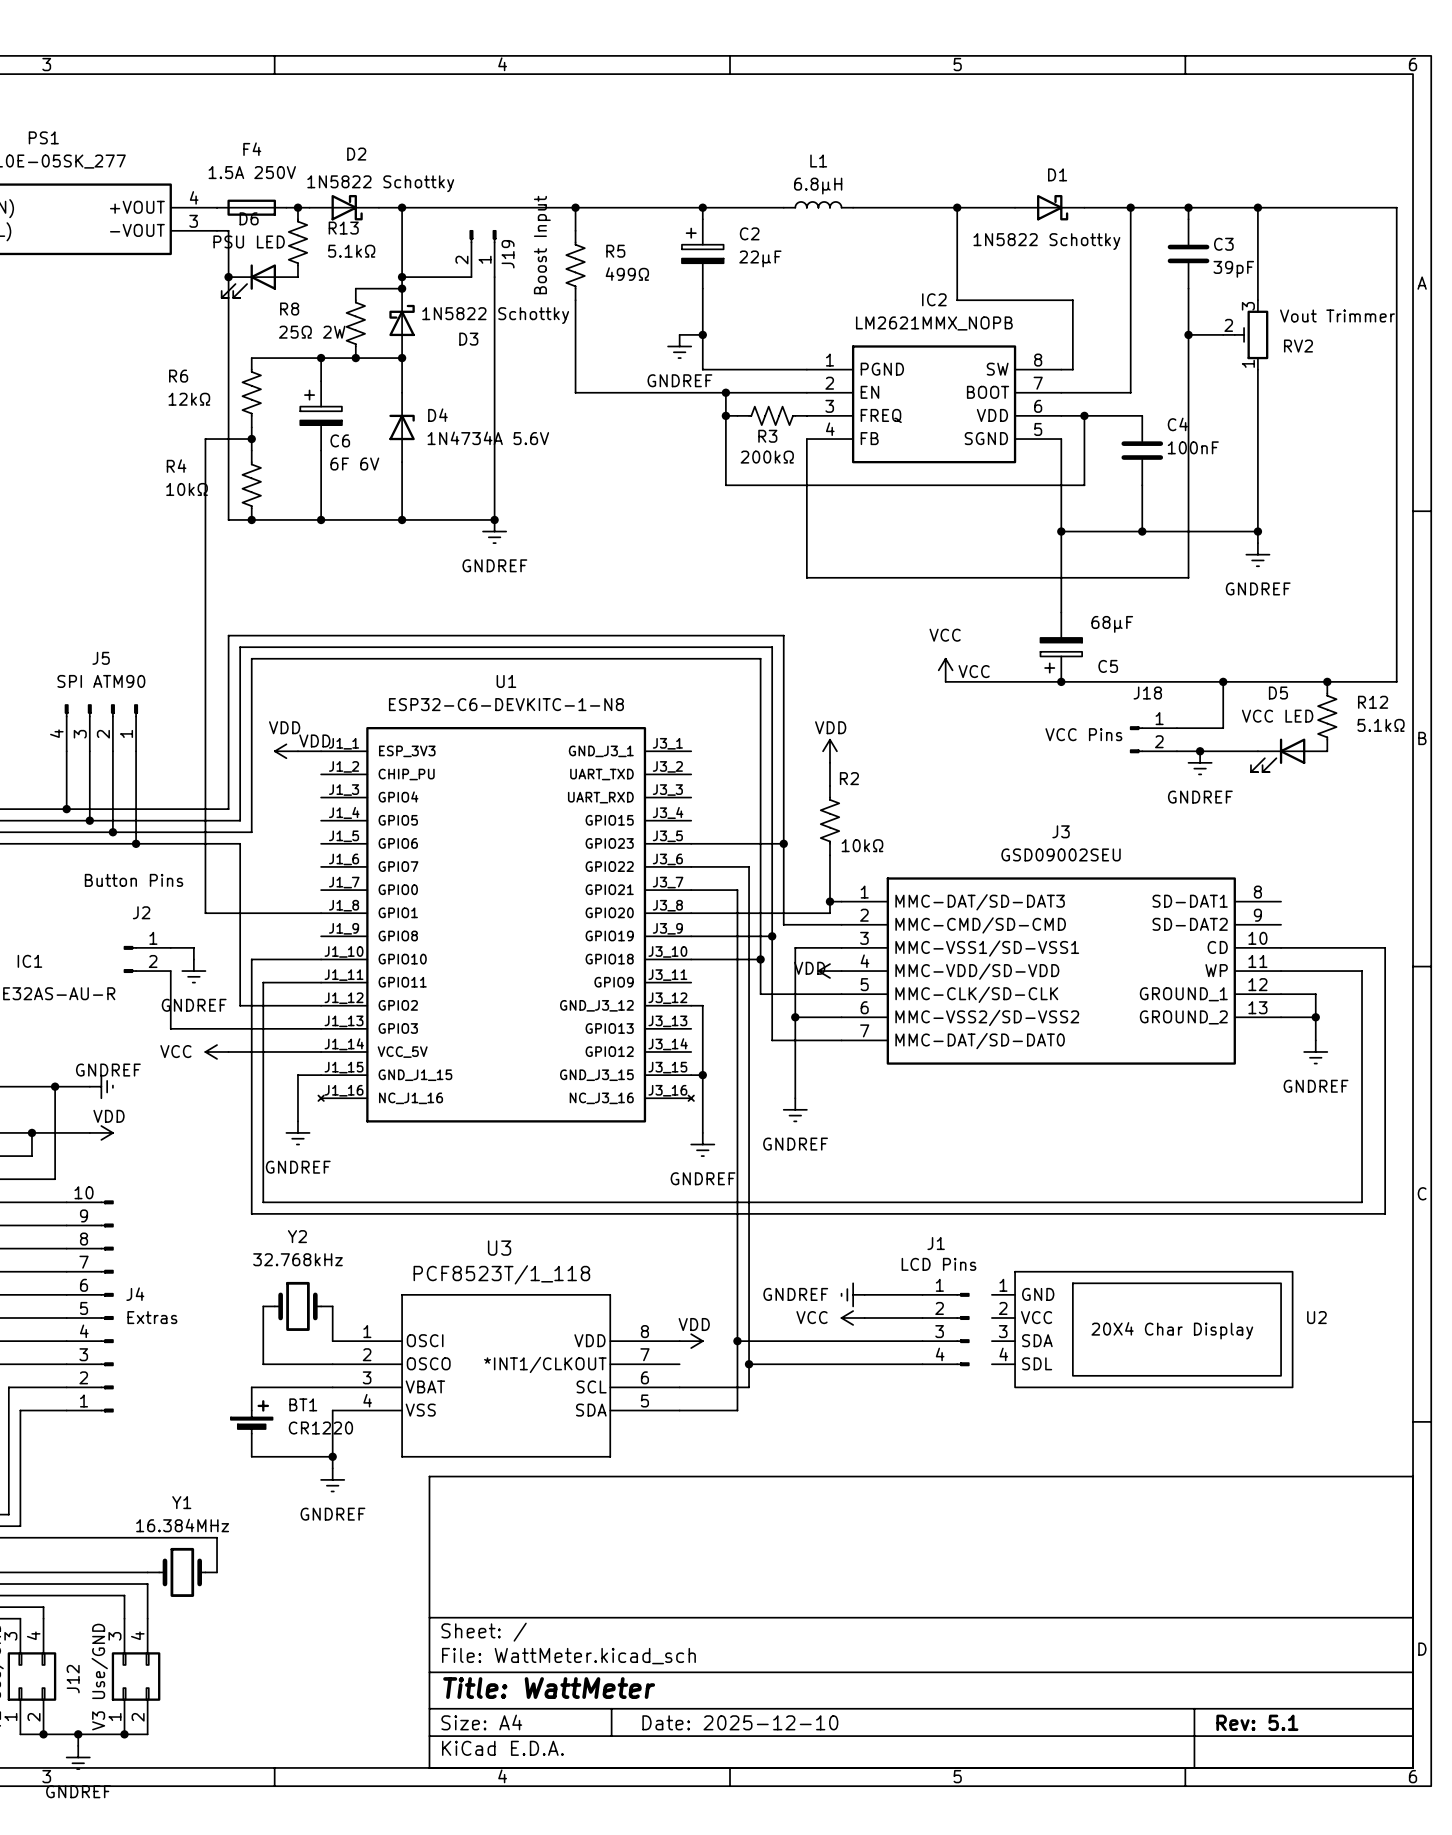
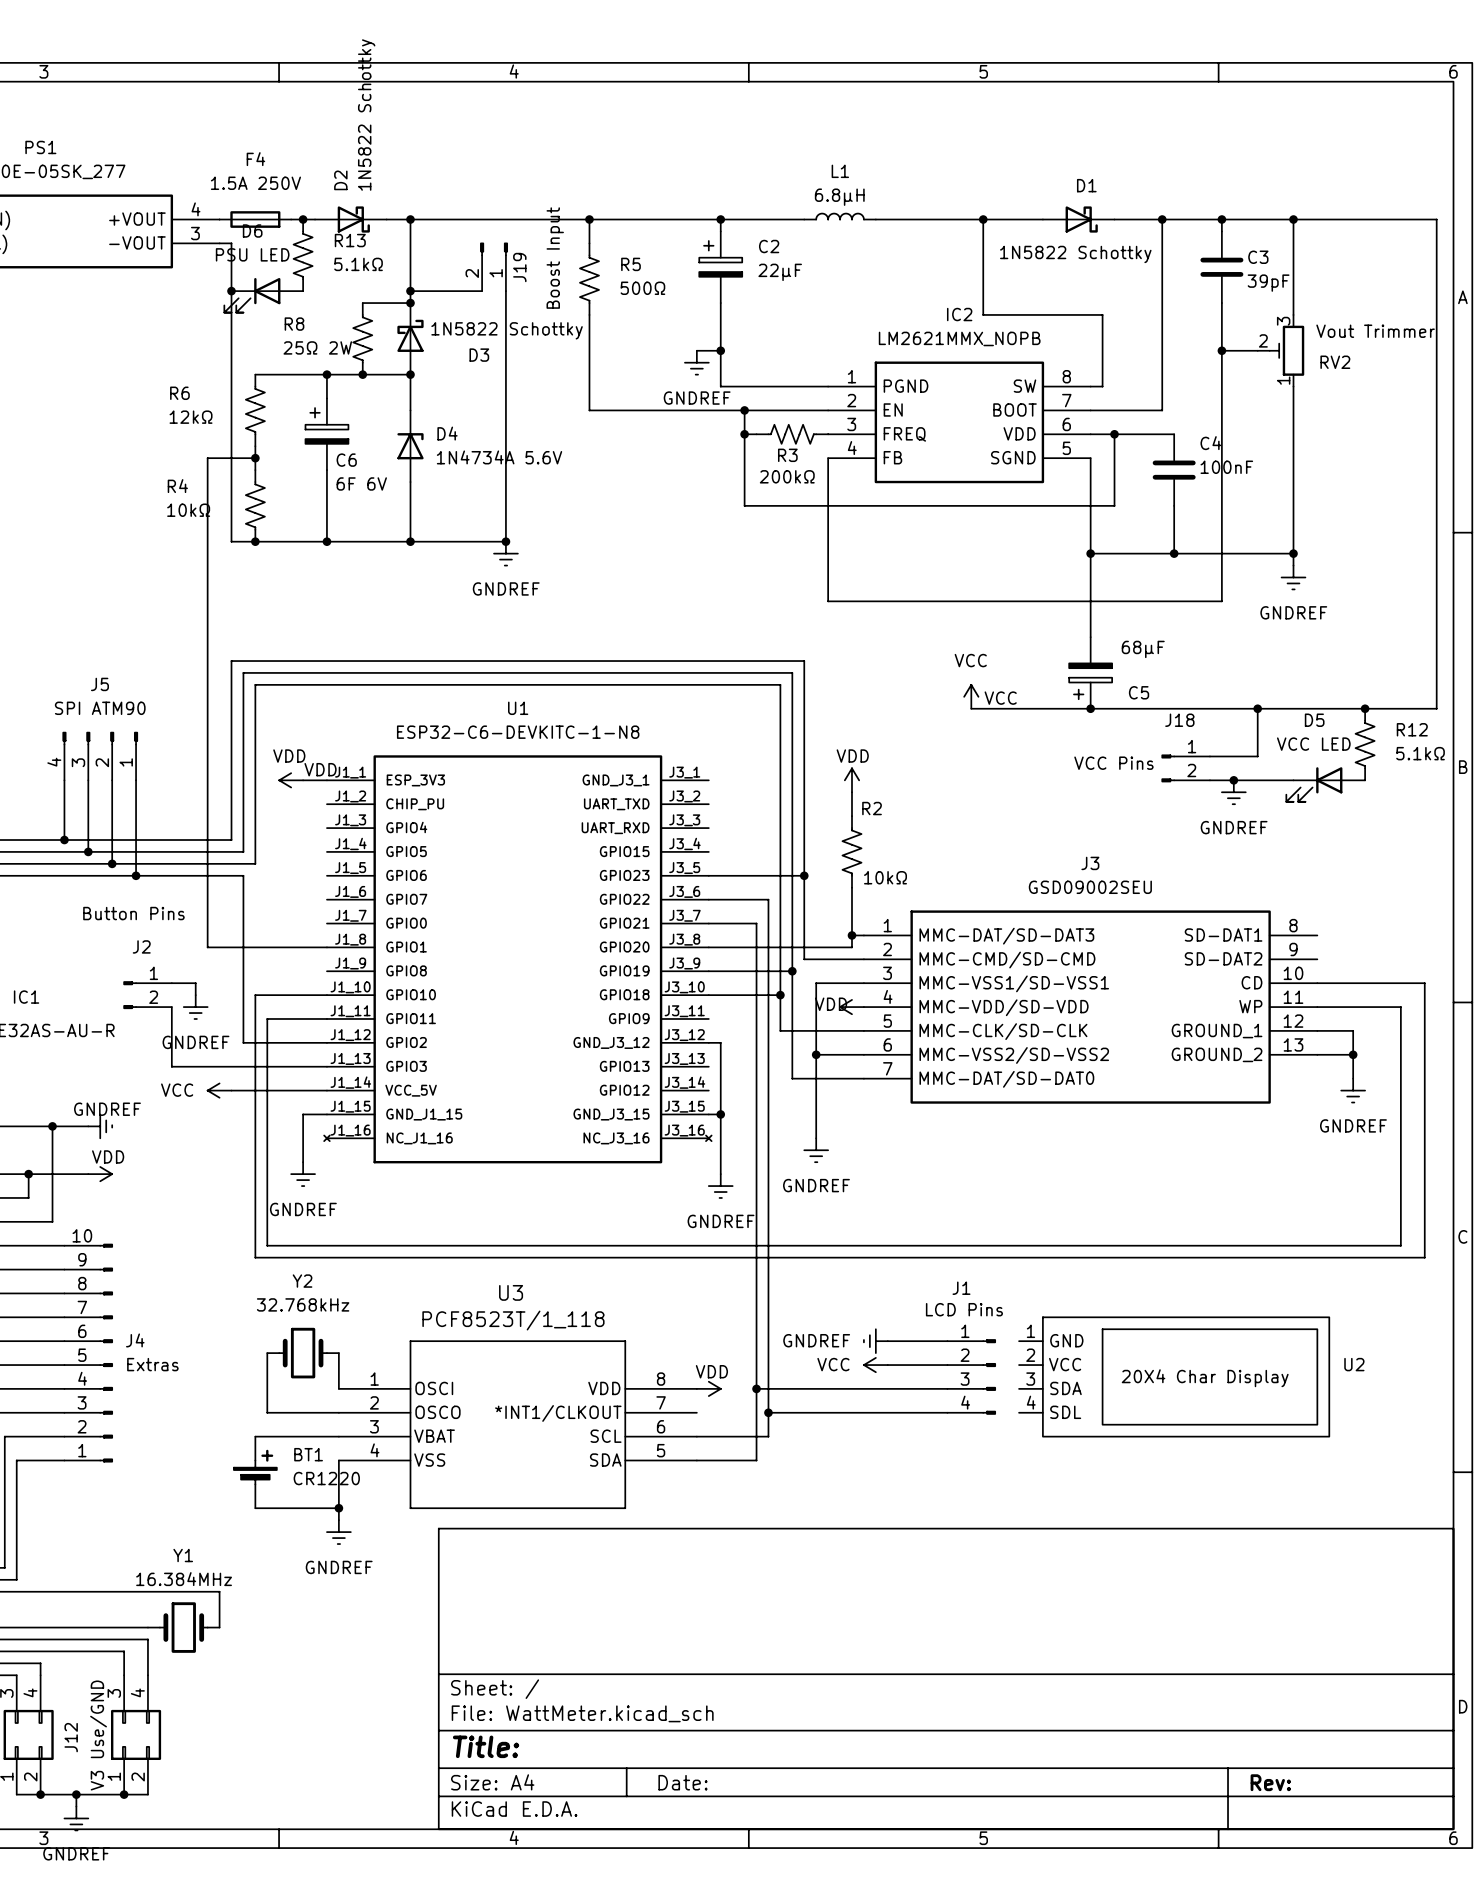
D2 name rotation: 0° (356, 154) -> 90° counterclockwise (340, 180)
D2 value rotation: 0° (380, 183) -> 90° counterclockwise (366, 115)
R5 value: 499Ω (627, 274) -> 500Ω (642, 288)
title block: Title: WattMeter (549, 1688) -> Title: (486, 1746)
title block: Date: 2025-12-10 (740, 1722) -> Date: (682, 1782)
title block: Rev: 5.1 (1257, 1722) -> Rev: (1270, 1782)

